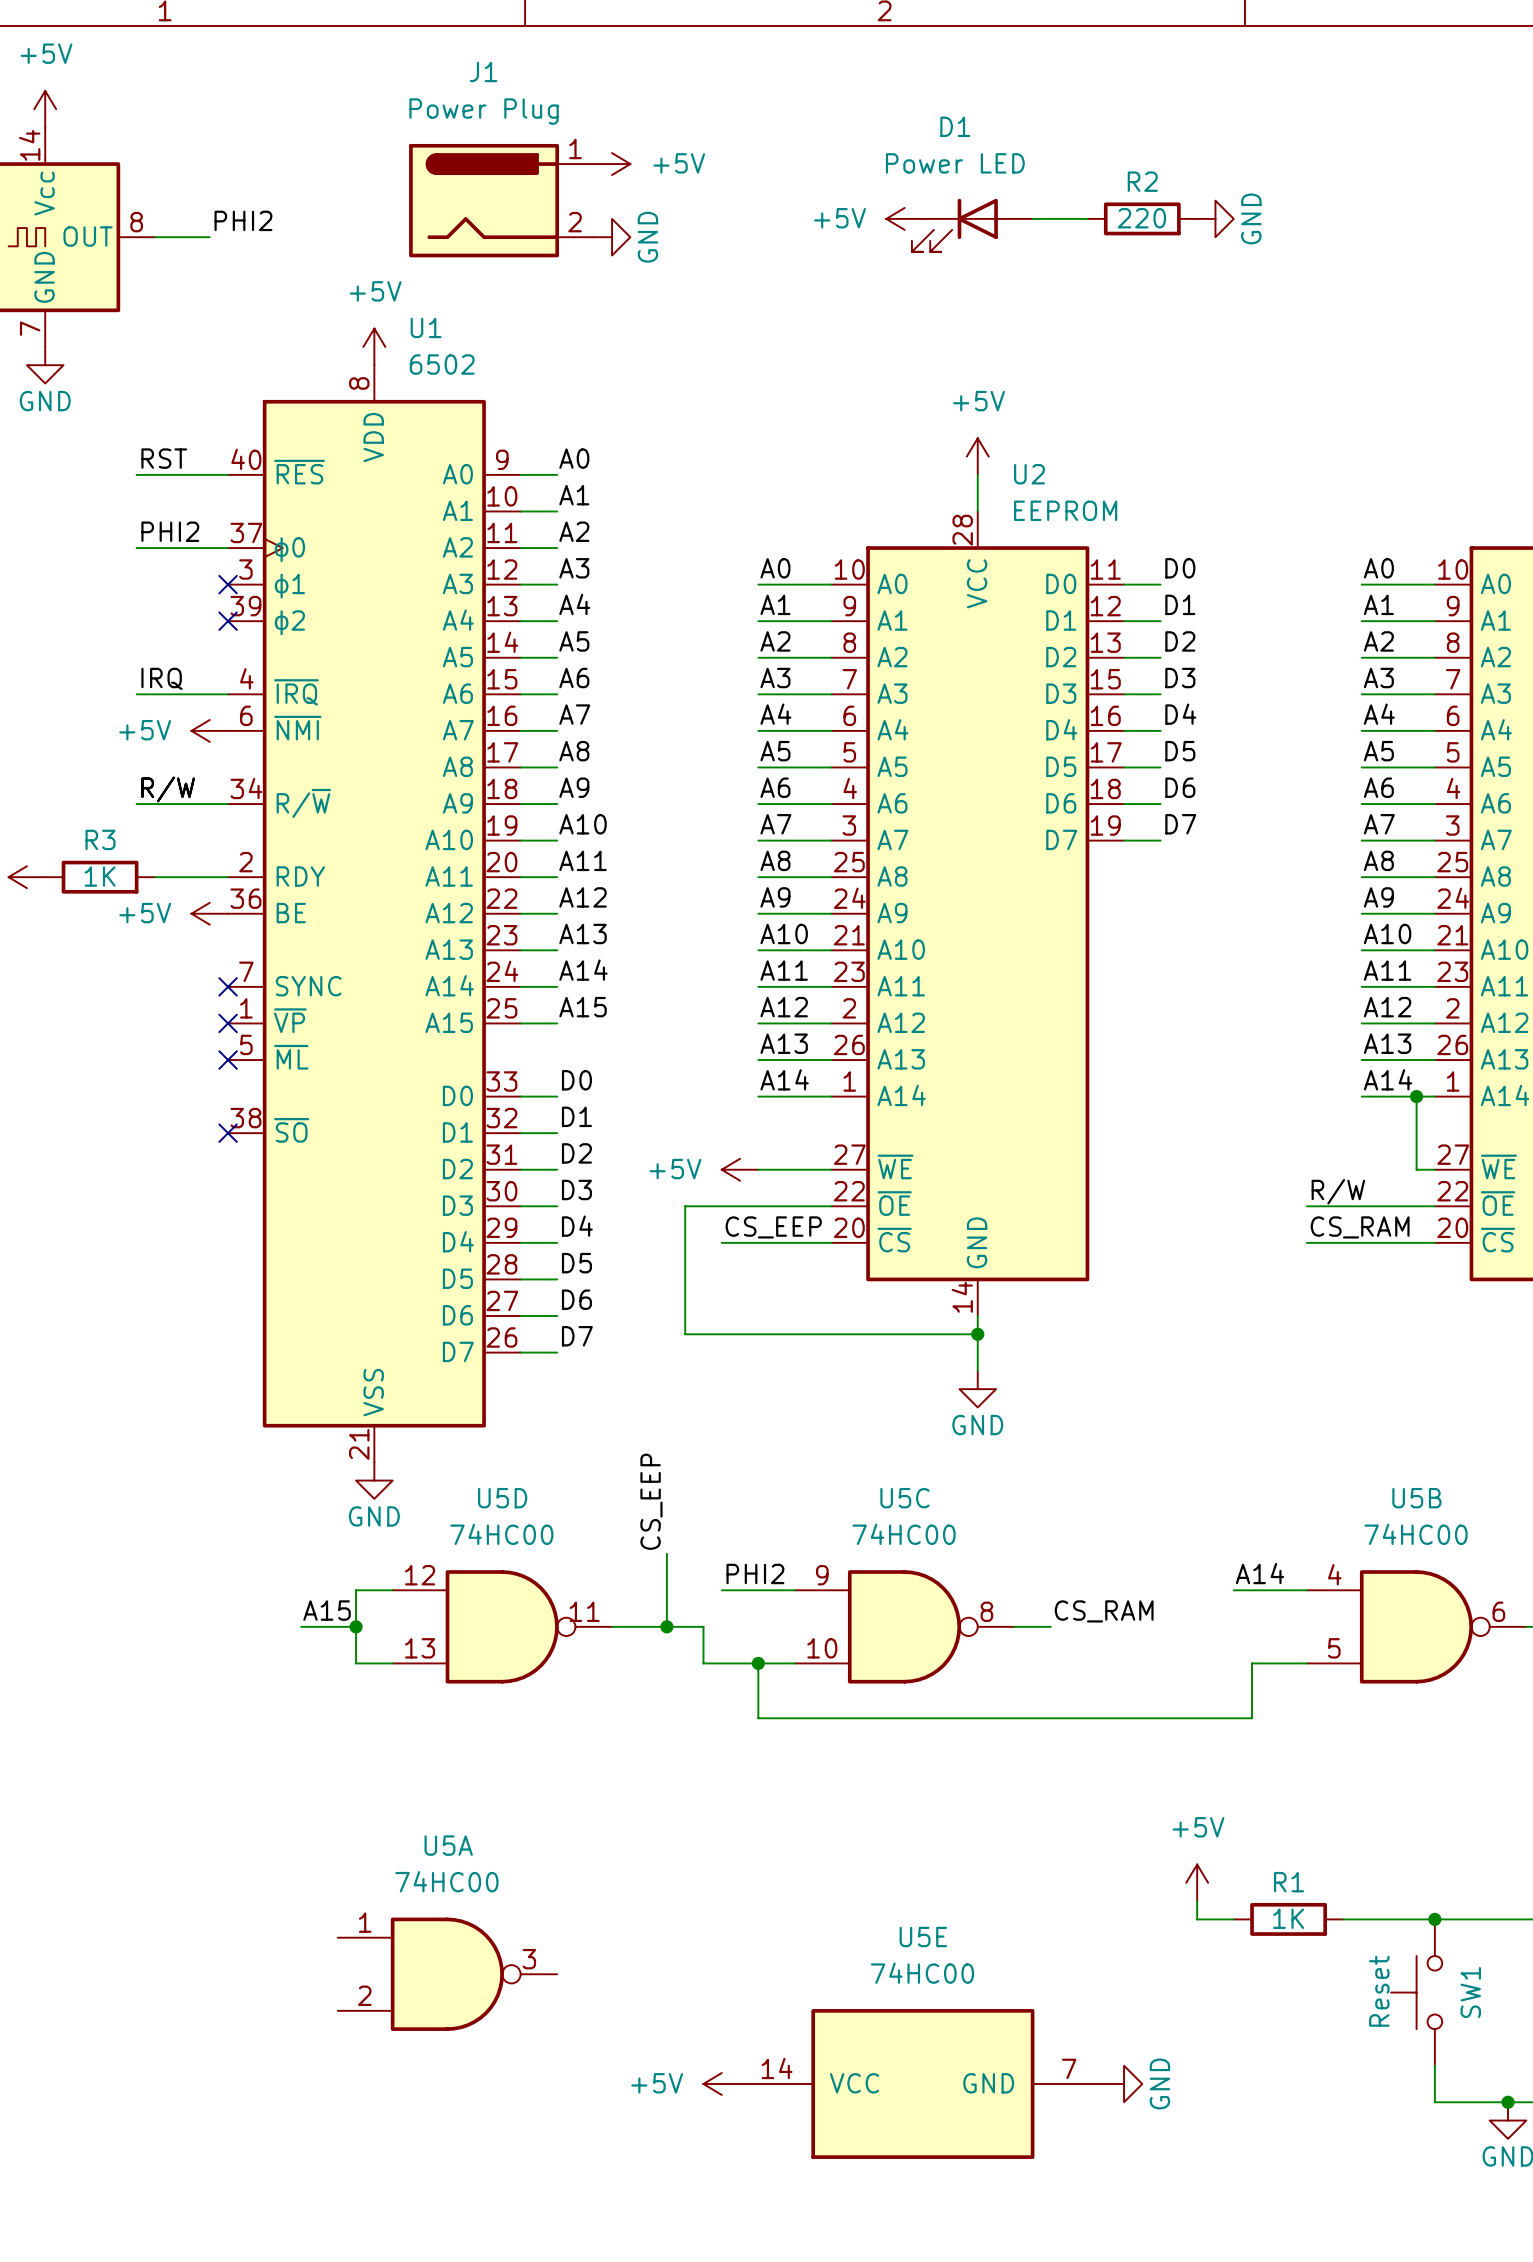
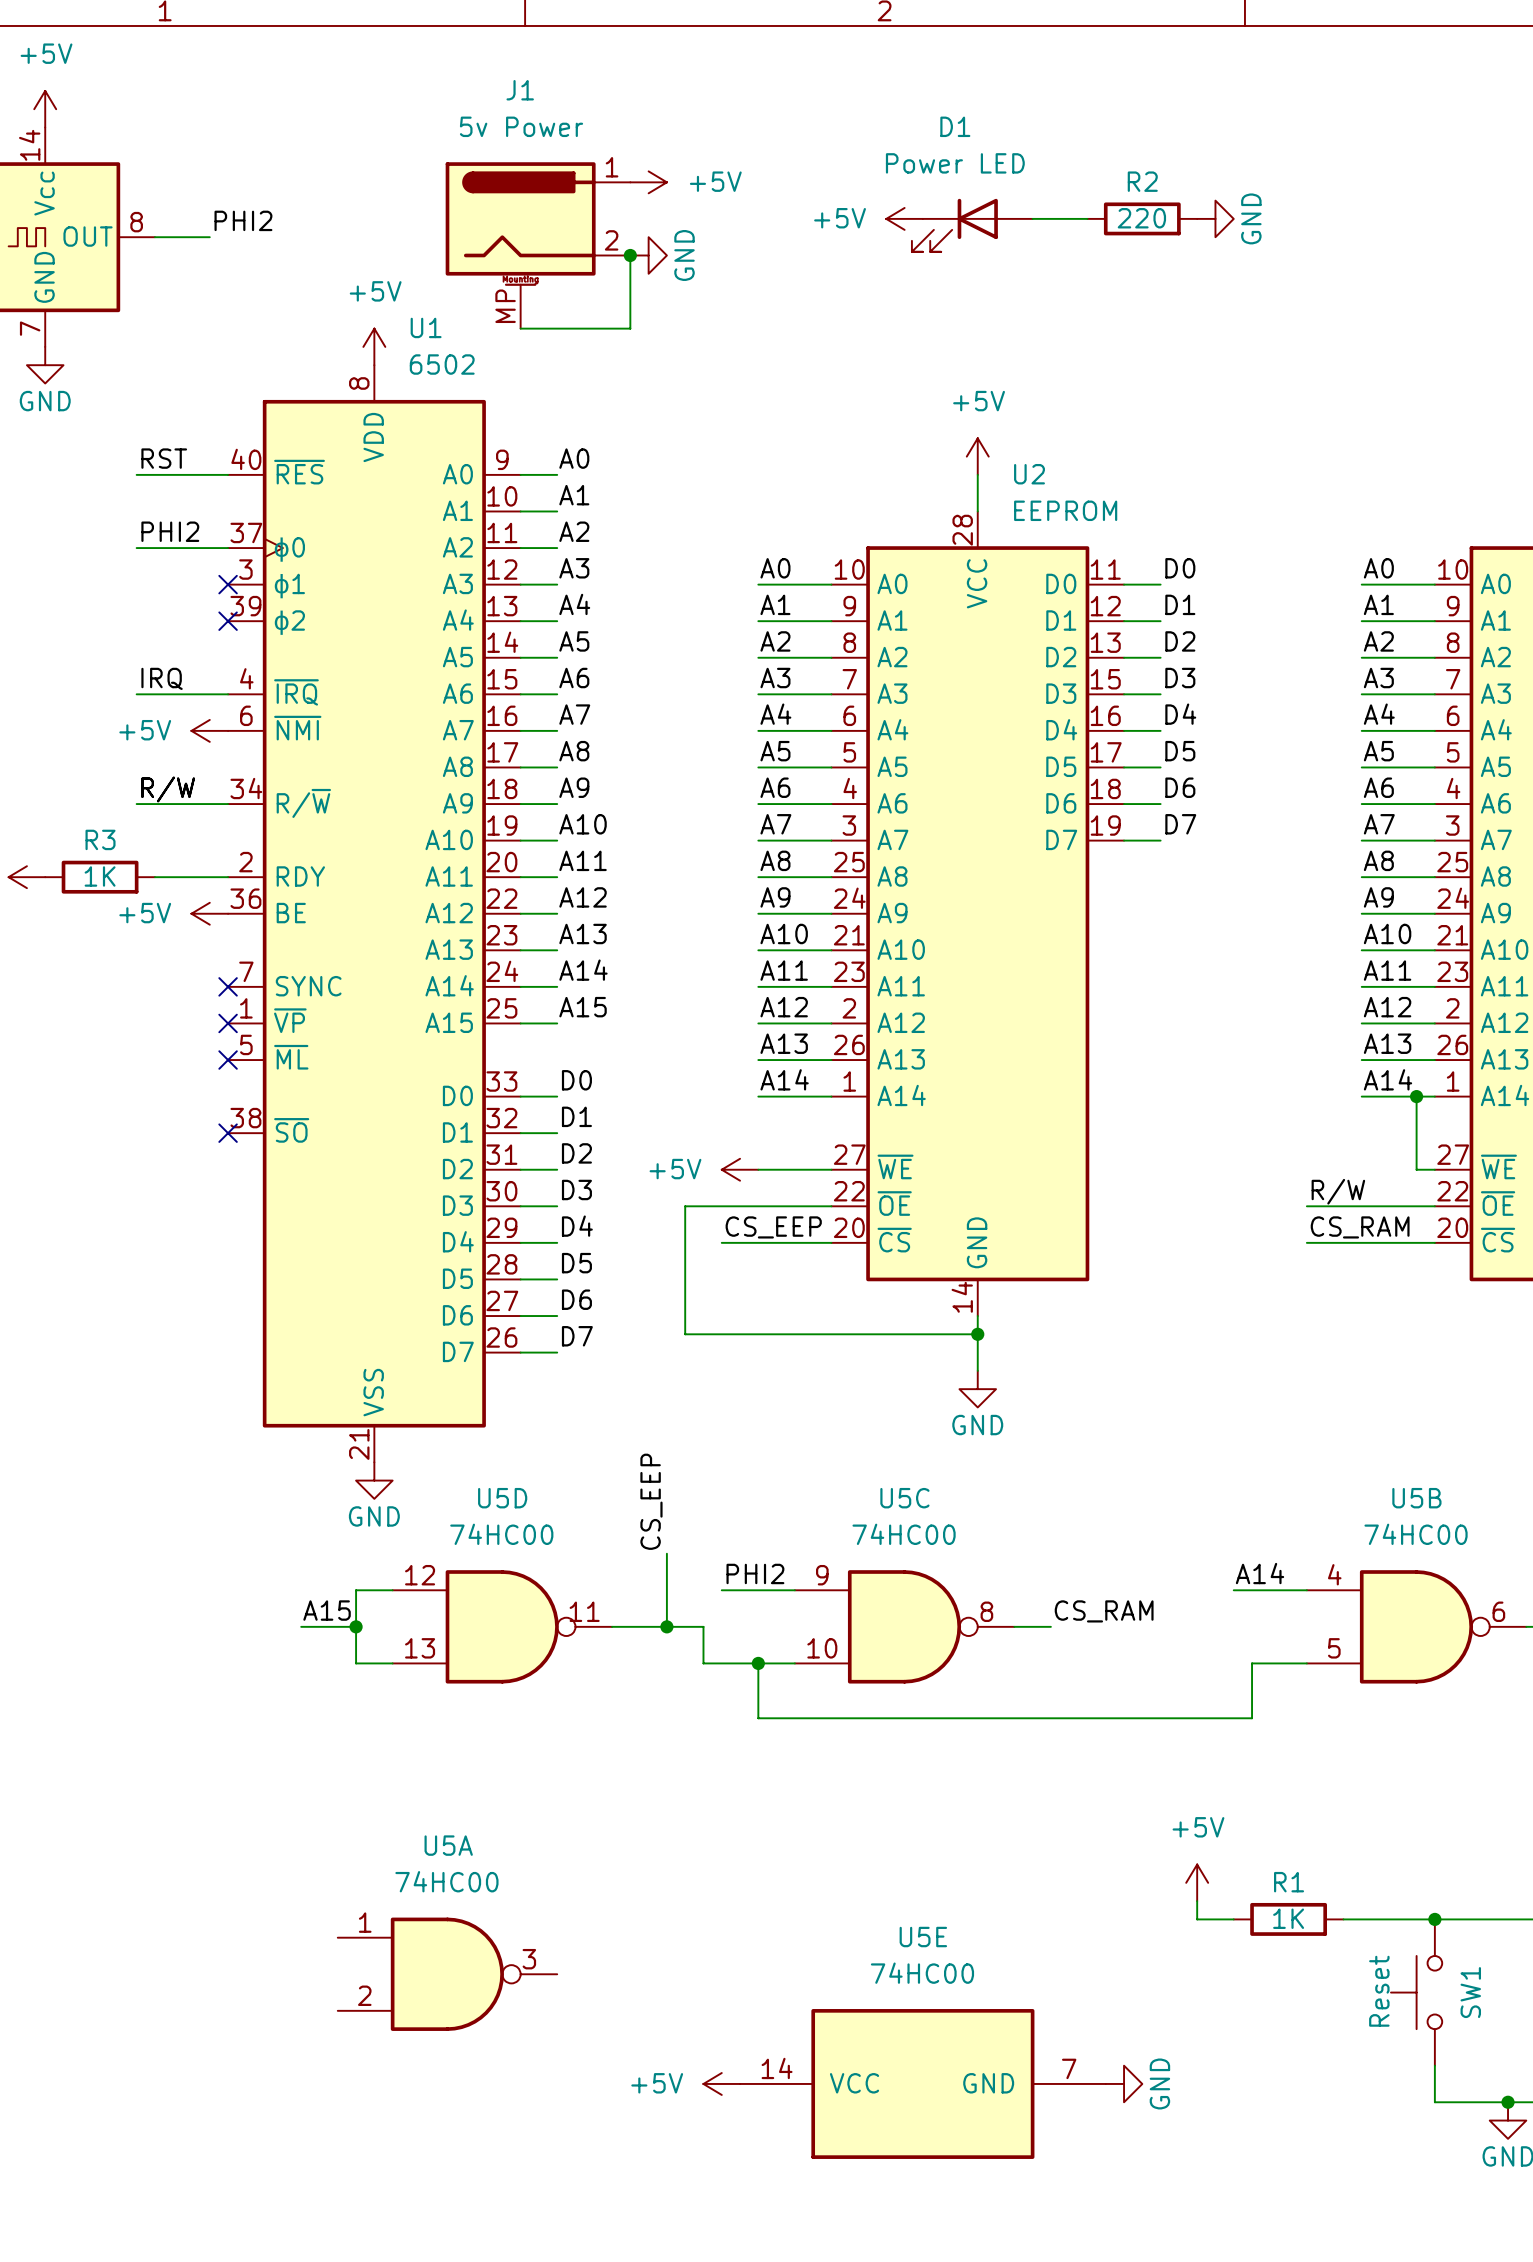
J1 value: Power Plug (484, 111) -> 5v Power (521, 126)
J1 symbol: [409, 143, 594, 258] -> [445, 162, 631, 329]
power symbol position: +5V (612, 164) -> +5V (648, 182)
power symbol position: GND (612, 237) -> GND (648, 255)
wire: none -> (630, 255) (630, 328) (520, 328)
junction: none -> (630, 255)

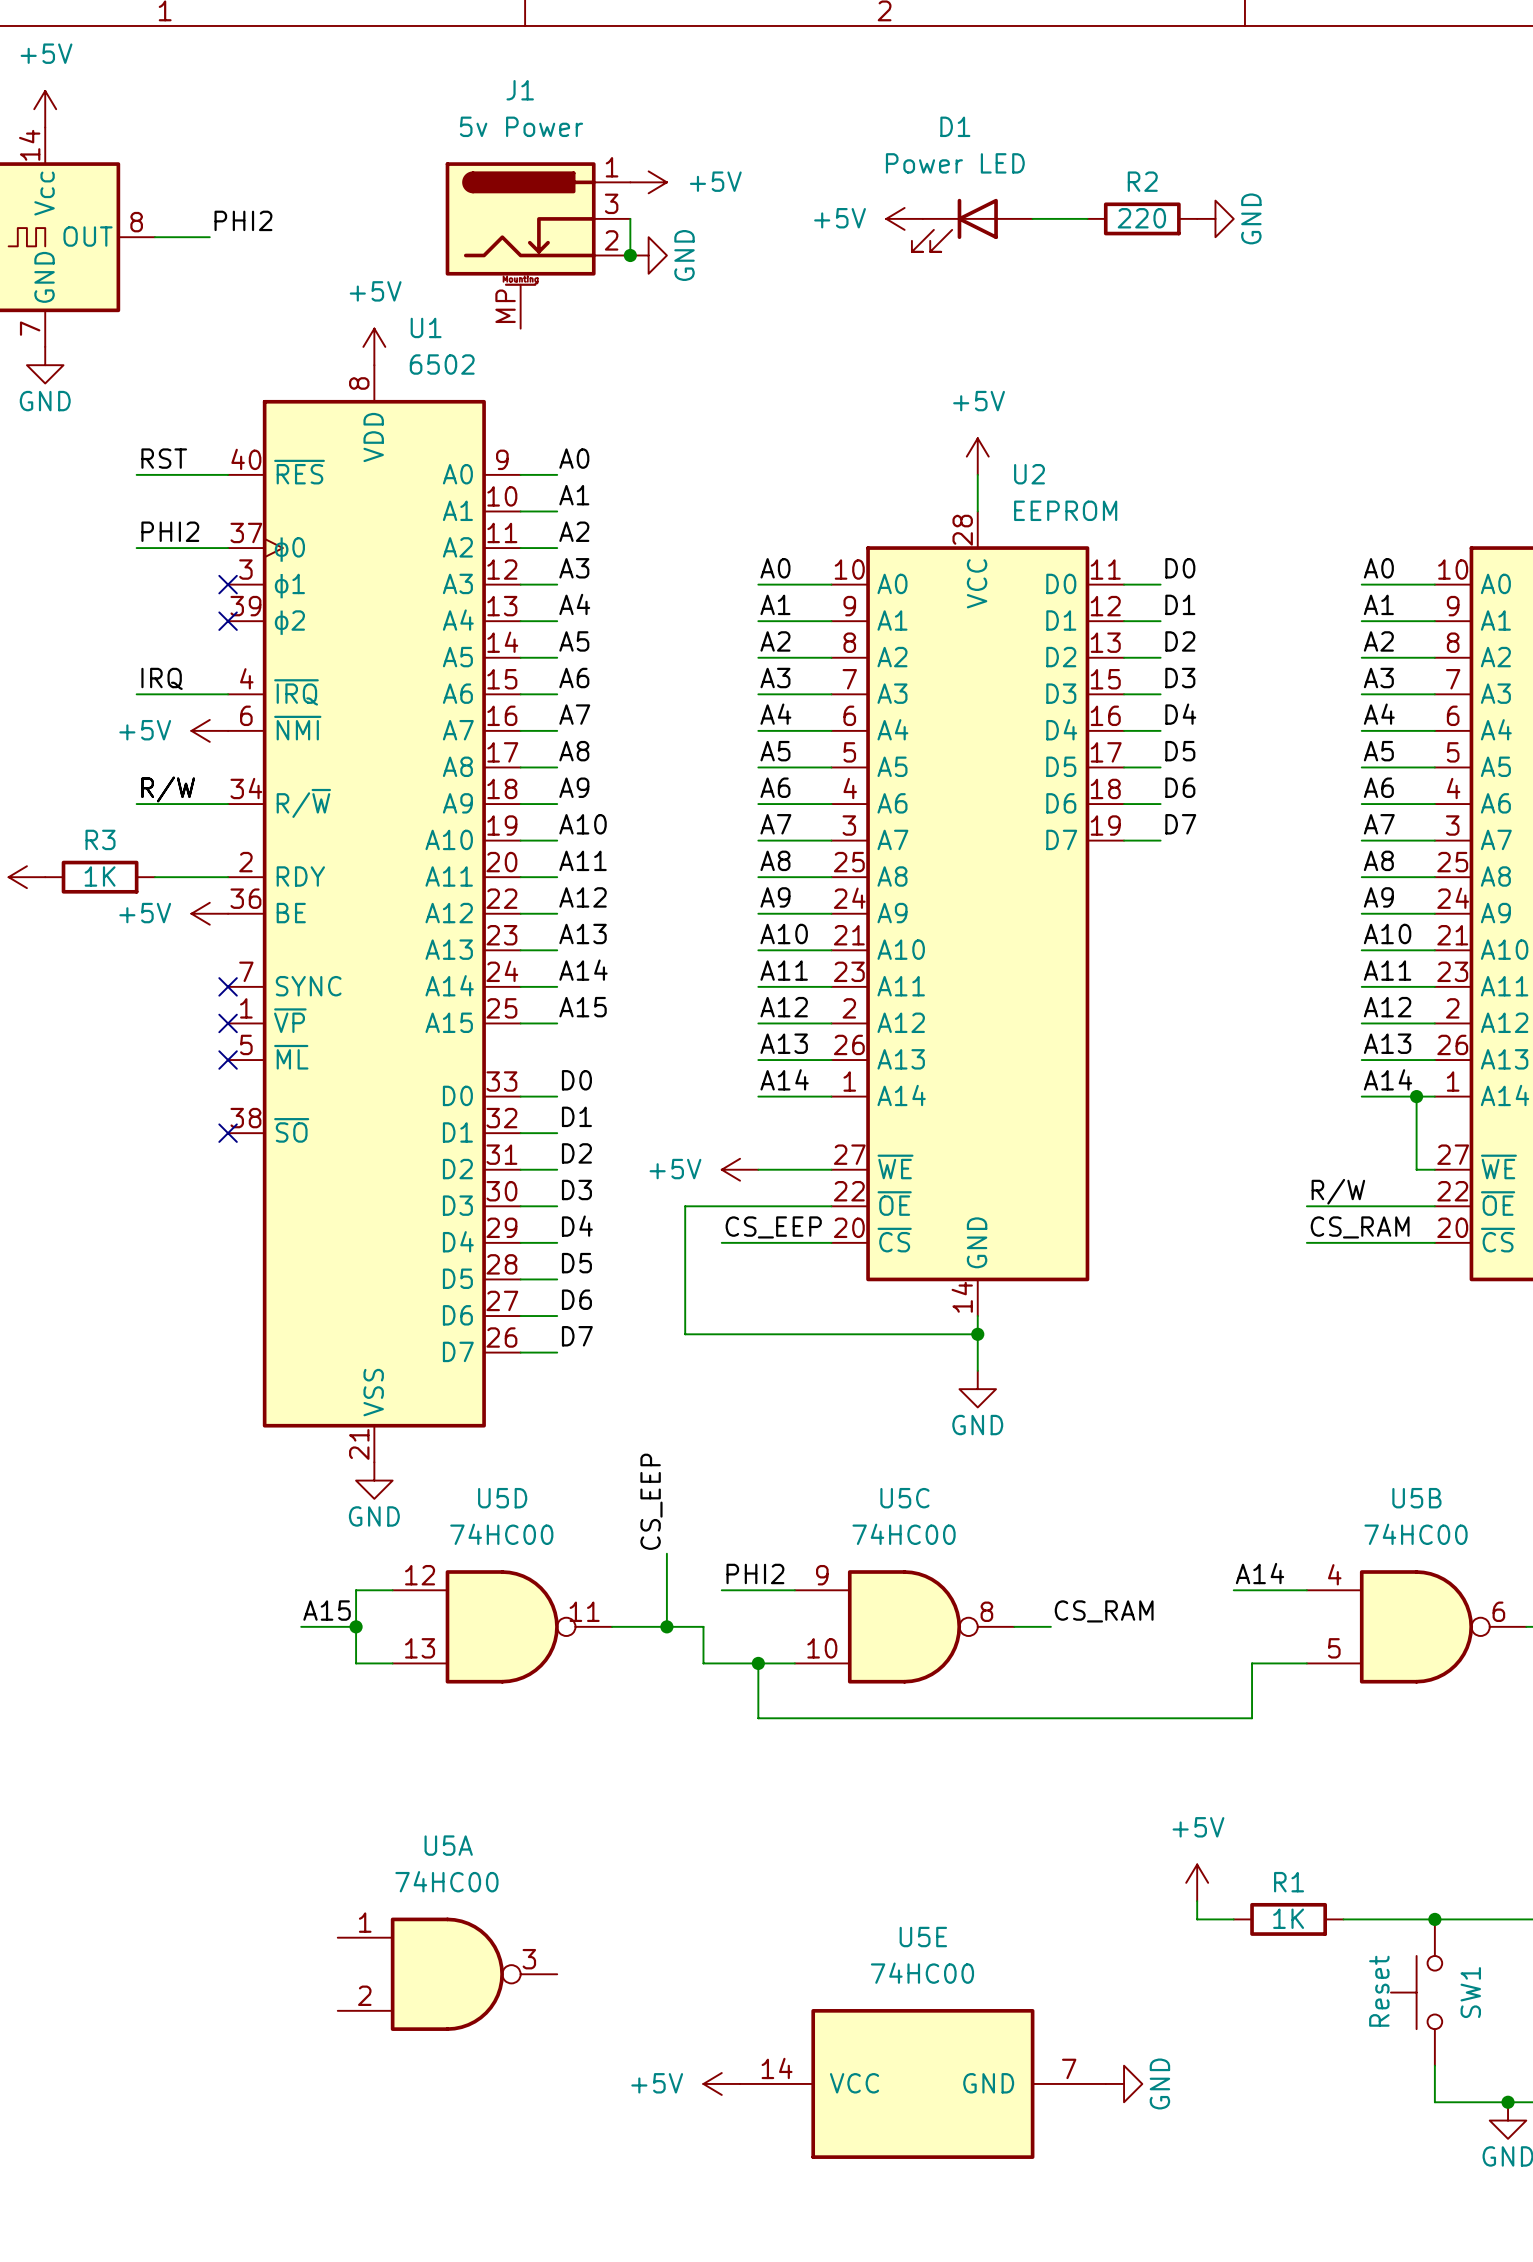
J1 symbol: [445, 162, 631, 329] -> [445, 162, 631, 329]
wire: (630, 255) (630, 328) (520, 328) -> (630, 255) (630, 218)

